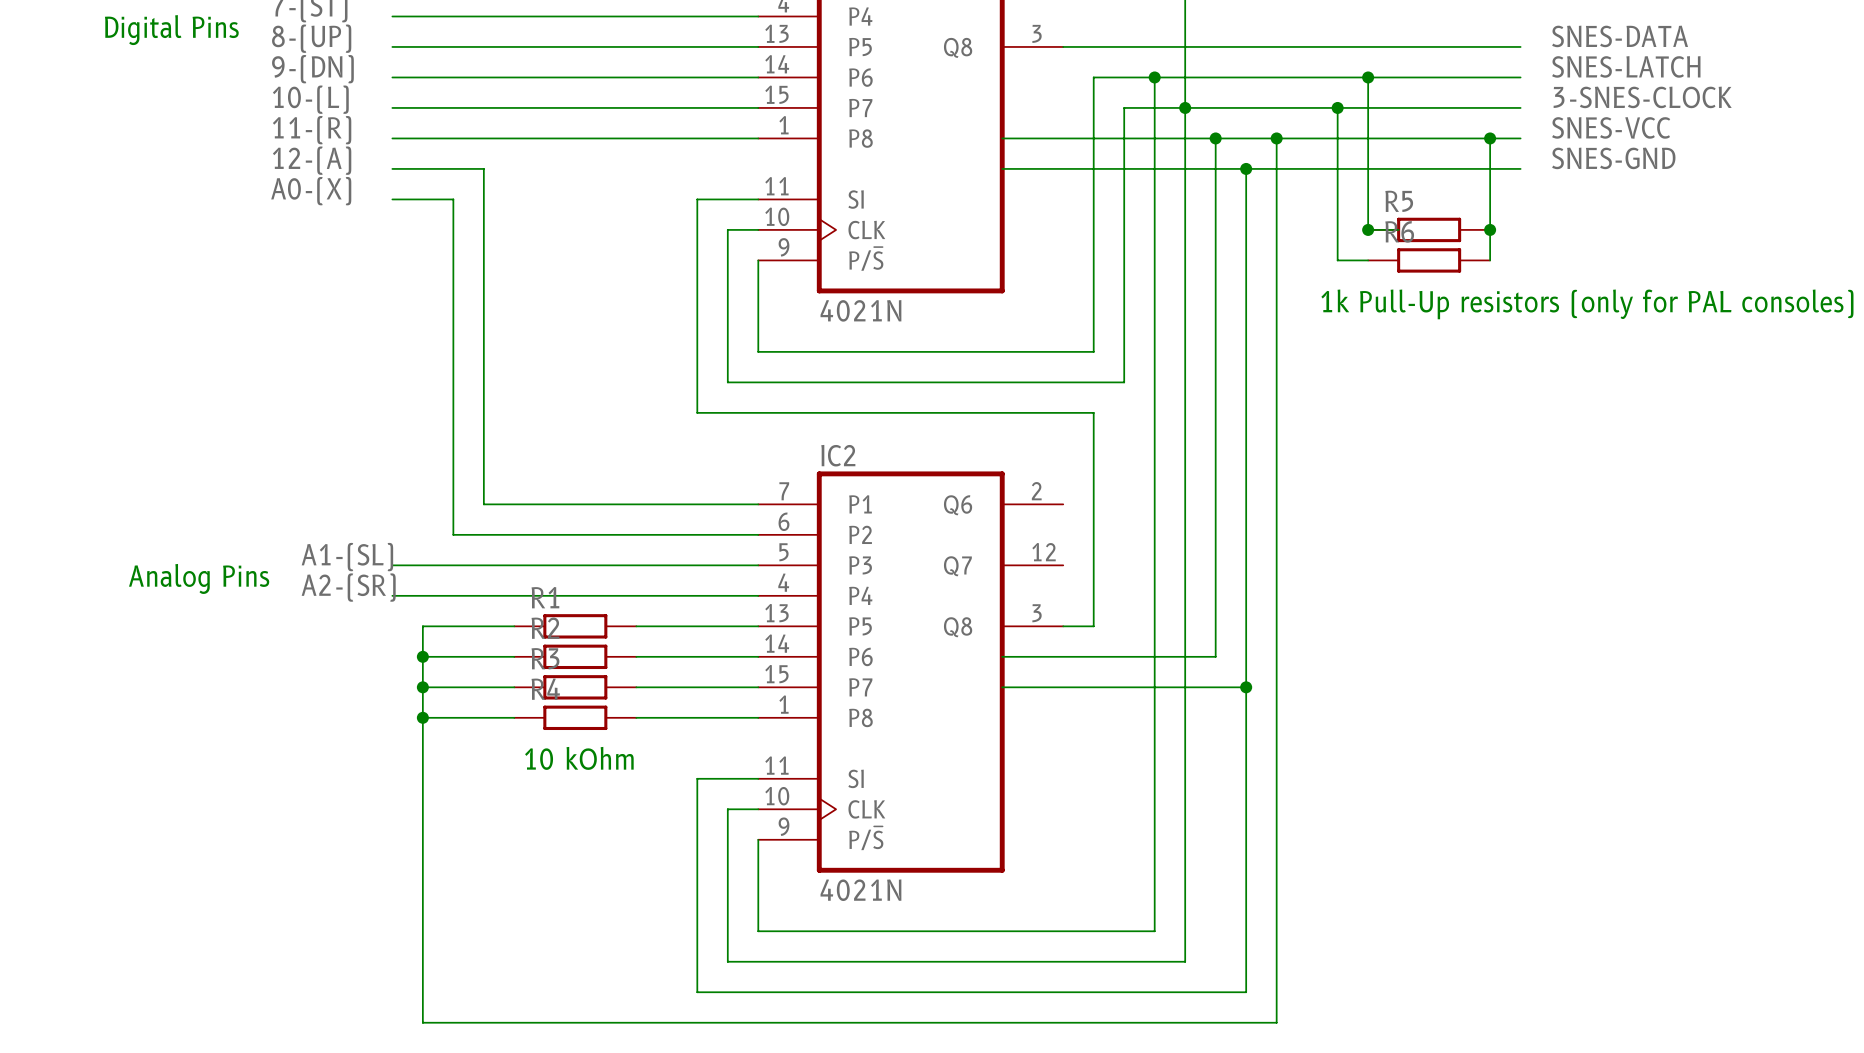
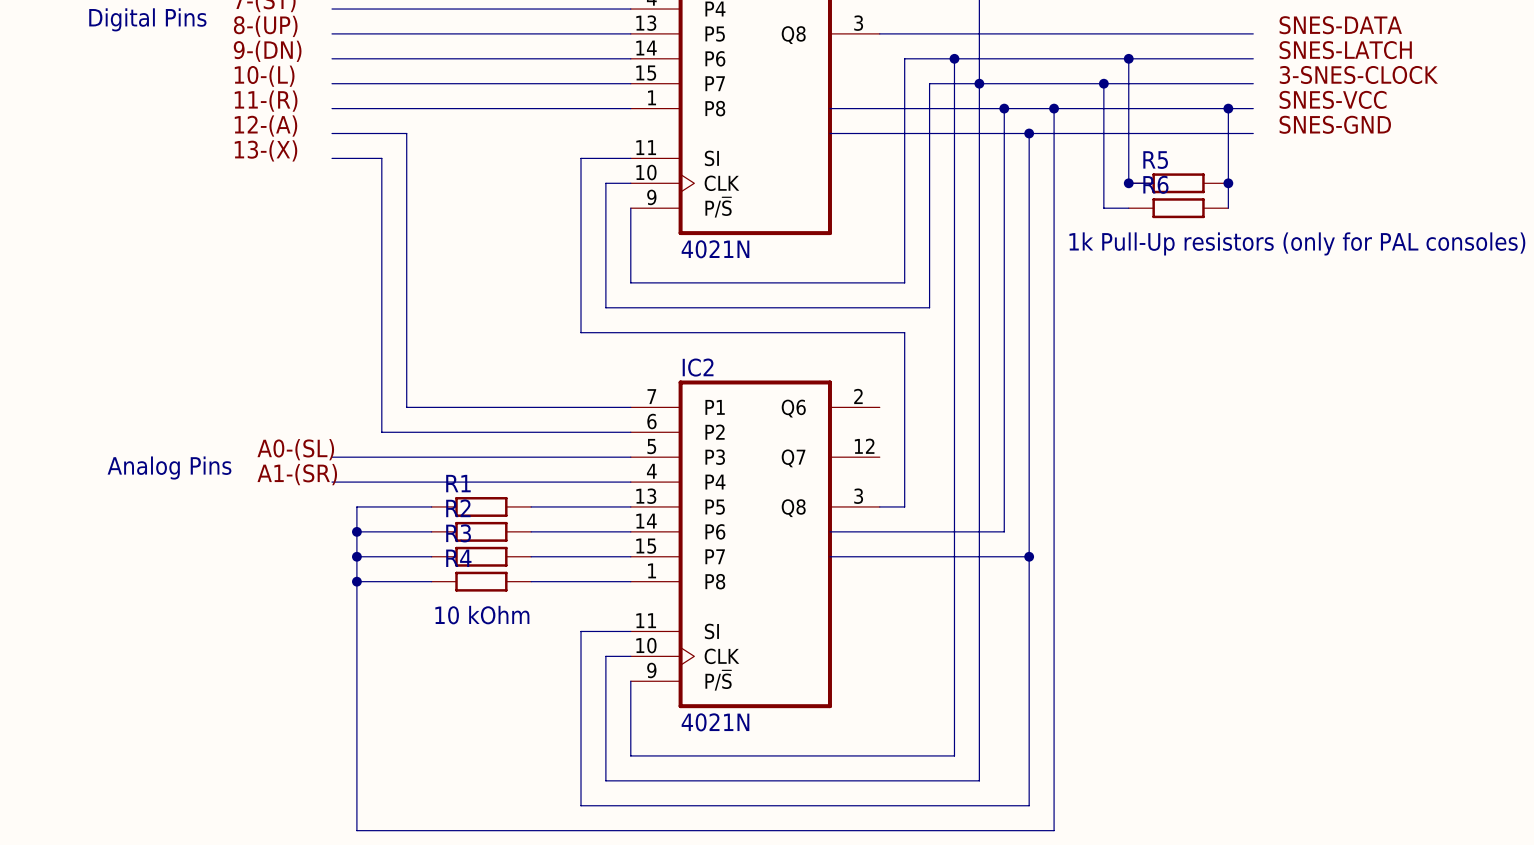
label: A0-(X) (311, 191) -> 13-(X) (266, 150)
label: A1-(SL) (347, 557) -> A0-(SL) (295, 449)
label: A2-(SR) (348, 587) -> A1-(SR) (297, 474)

